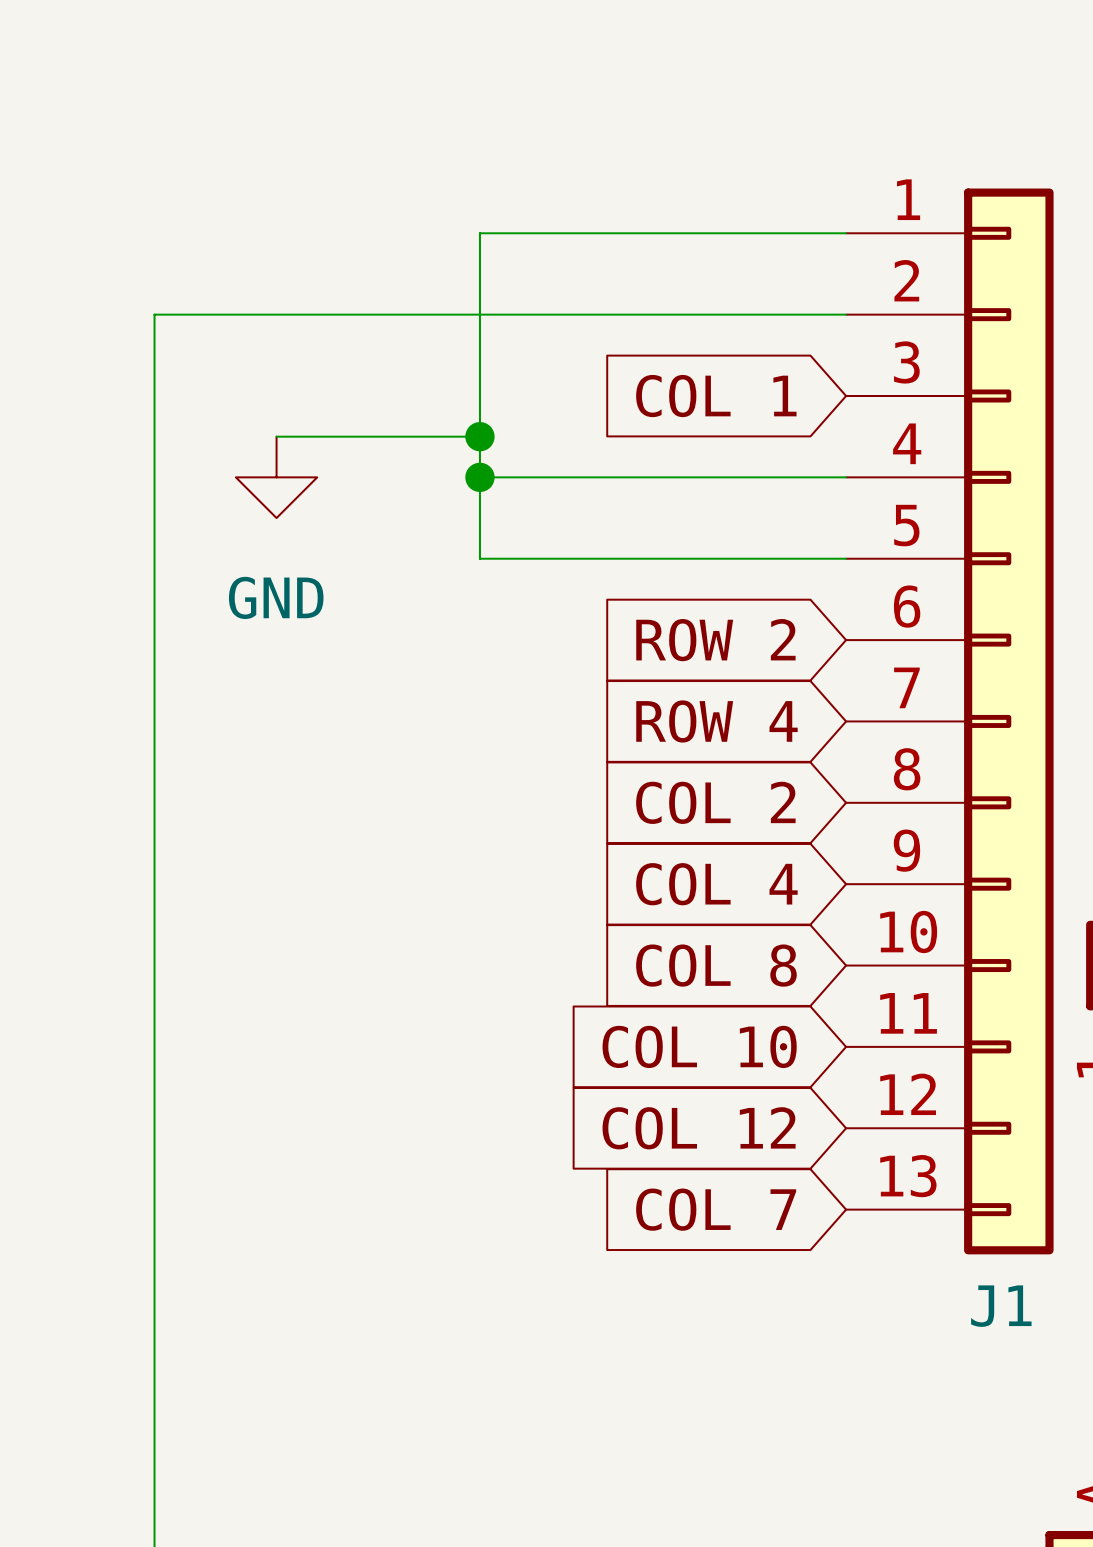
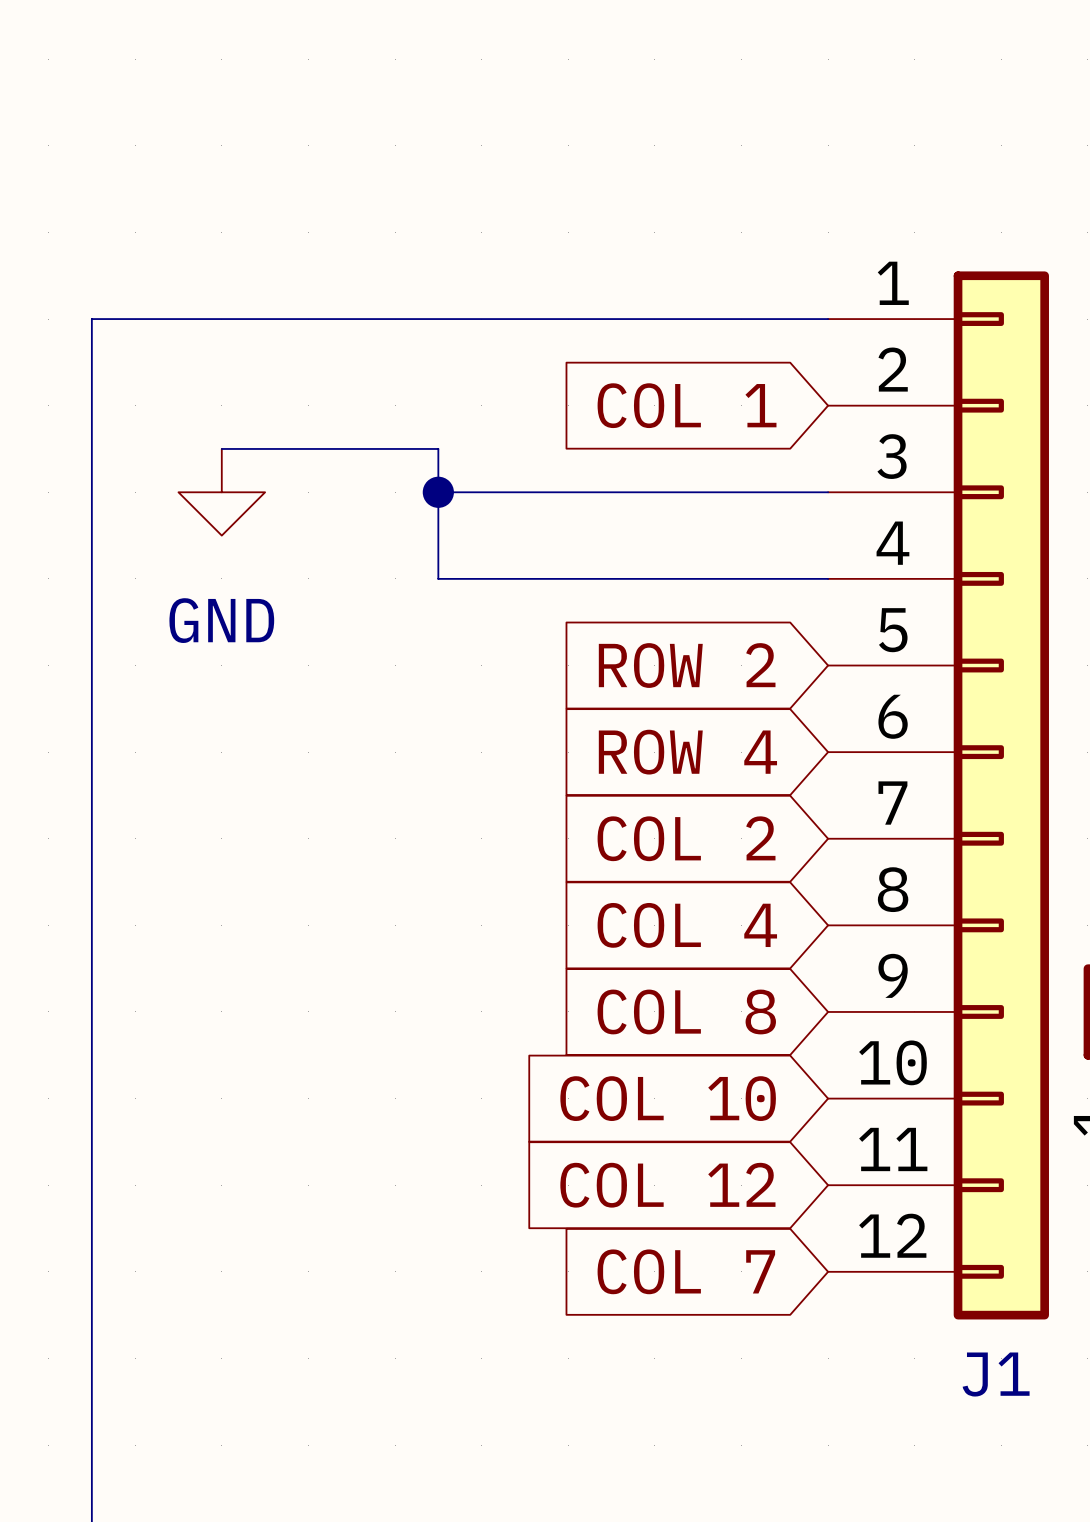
J1 symbol: [846, 188, 1054, 1255] -> [828, 271, 1049, 1320]
wire: (846, 233) (479, 233) (479, 436) -> none
junction: (479, 436) -> none

